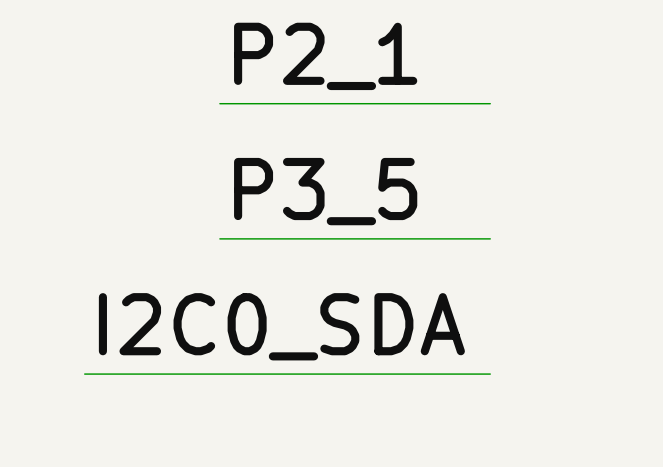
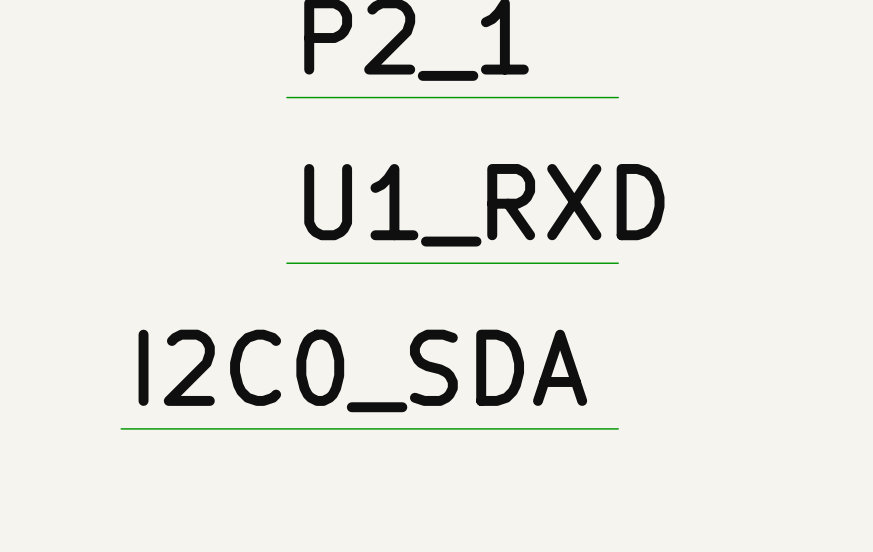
label: P3_5 (325, 191) -> U1_RXD (484, 205)

